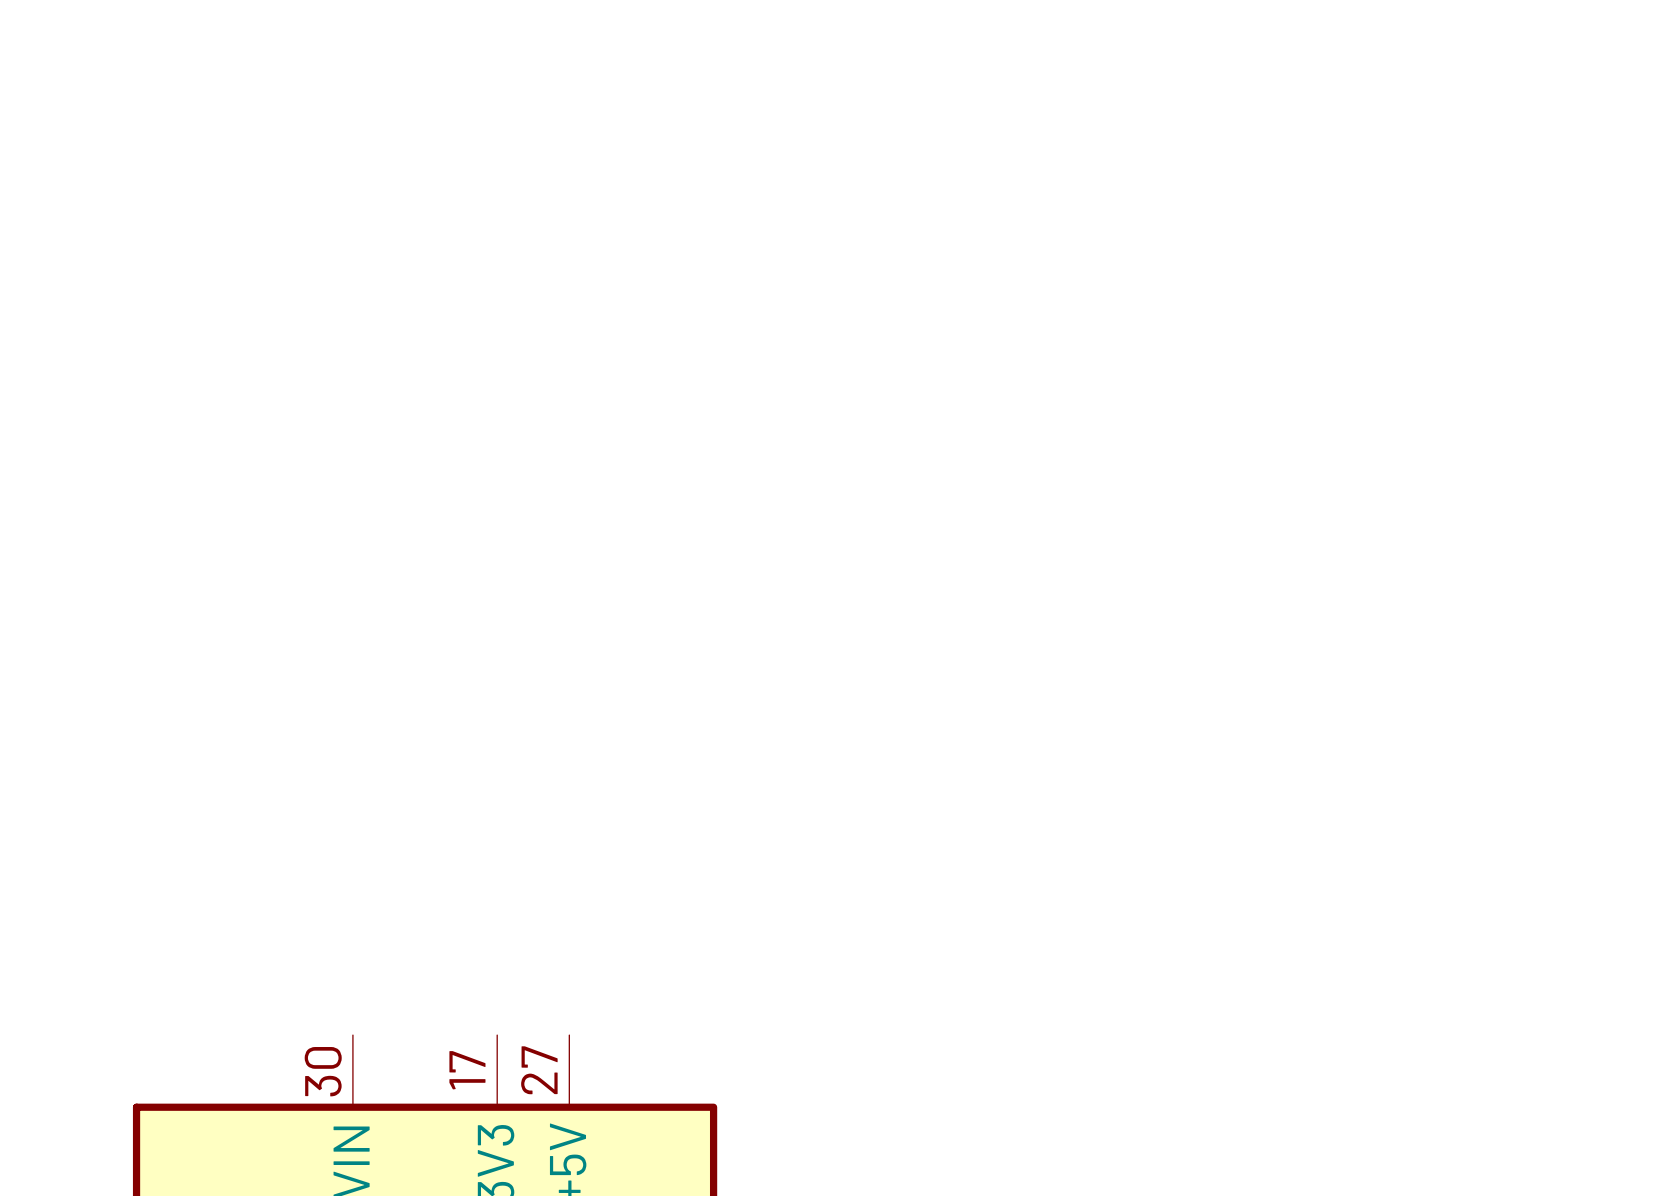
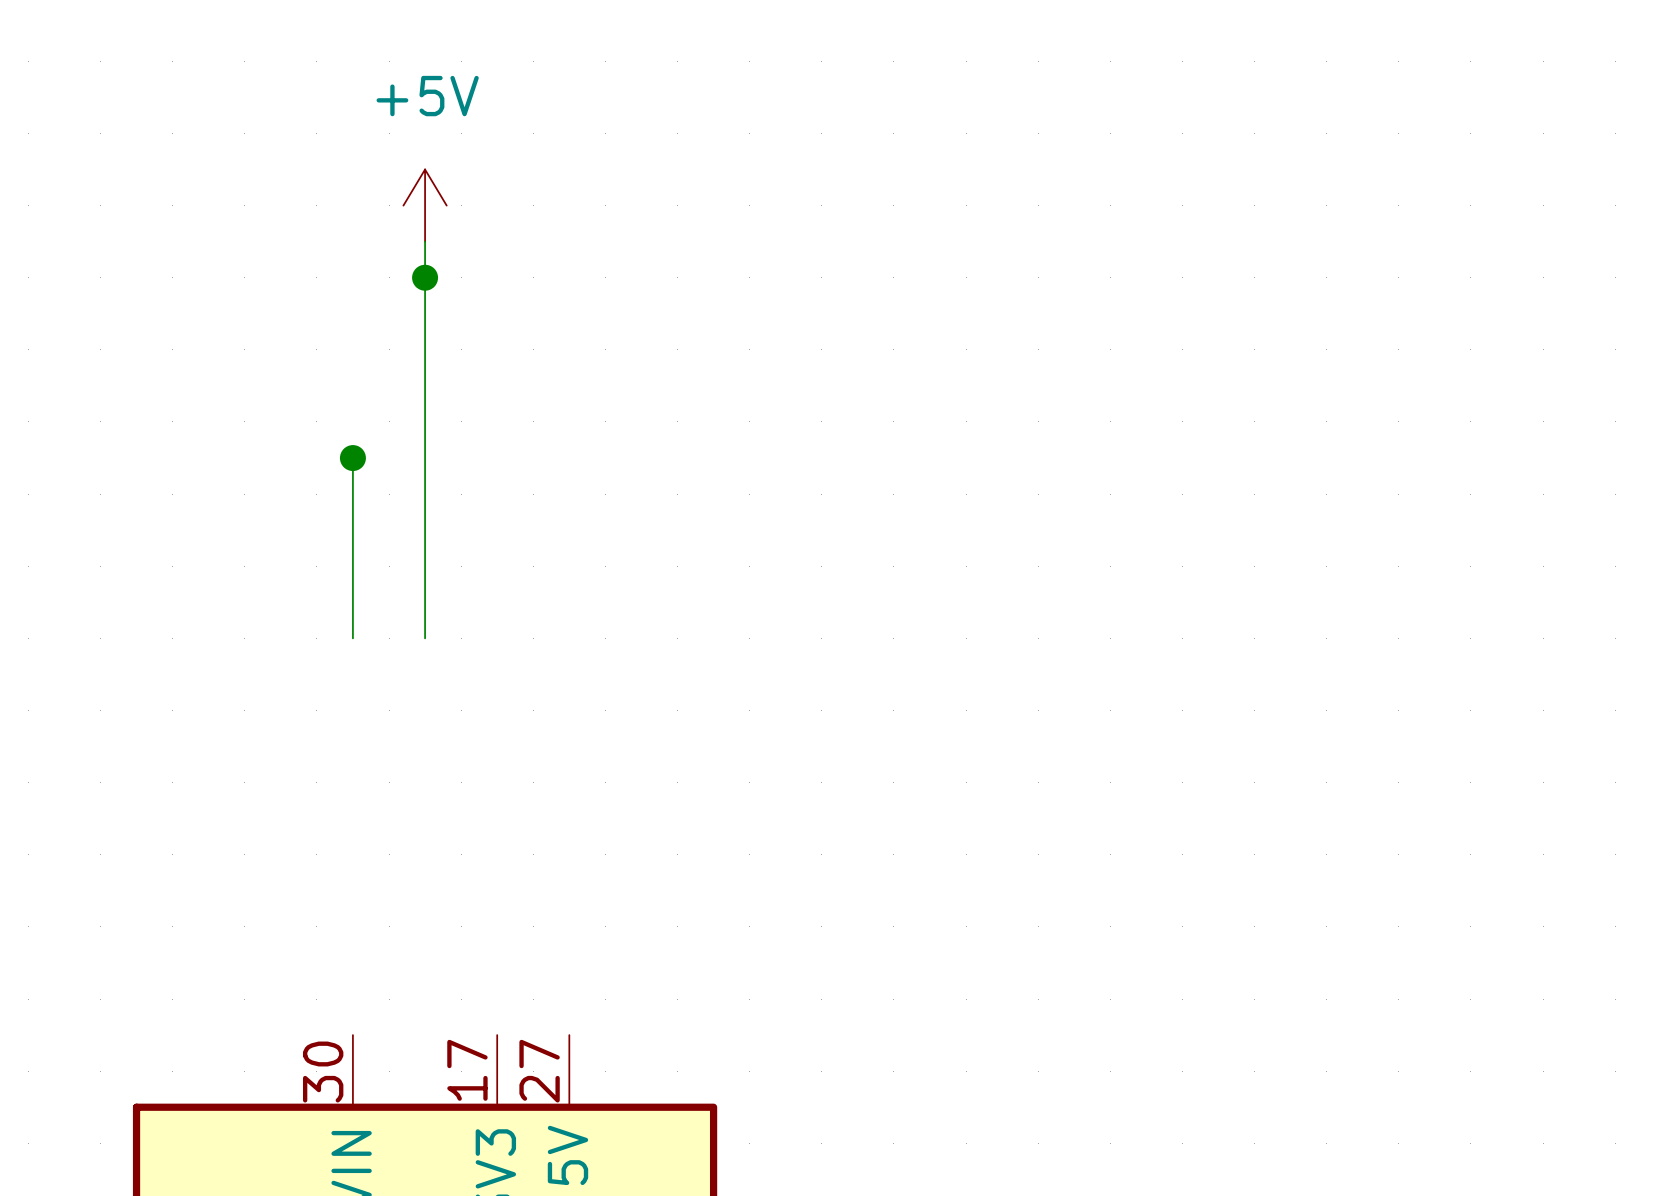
power symbol: none -> +5V (425, 205)
wire: none -> (425, 241) (425, 638)
junction: none -> (425, 277)
wire: none -> (352, 458) (352, 638)
junction: none -> (352, 458)

